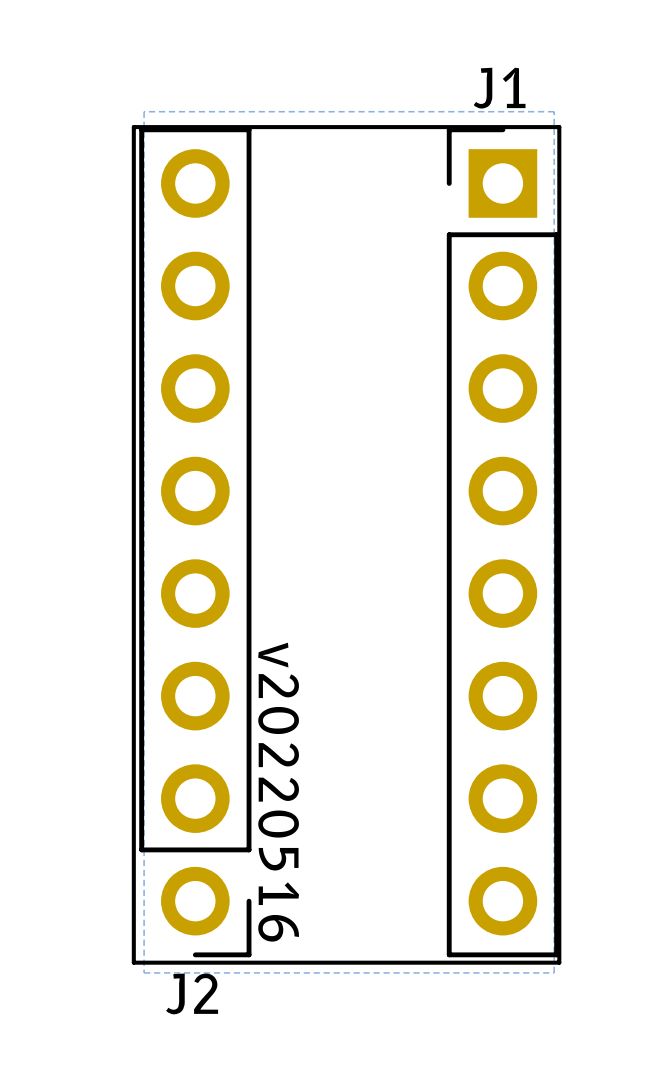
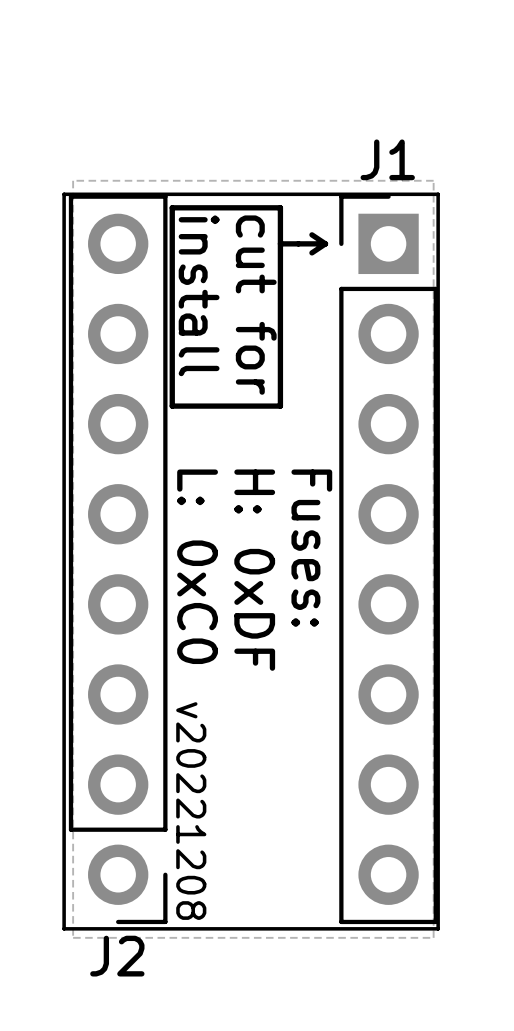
line: none -> (280, 207) (172, 207) (172, 406) (280, 406) (280, 207)
line: none -> (311, 234) (325, 243)
line: none -> (325, 243) (280, 243)
line: none -> (325, 243) (311, 252)
text: none -> install (199, 295)
text: none -> cut for (256, 305)
text: none -> Fuses: (311, 548)
text: none -> L: 0xC0 (197, 566)
text: none -> H: 0xDF (254, 570)
text: v20220516 (278, 792) -> v20221208 (191, 811)

